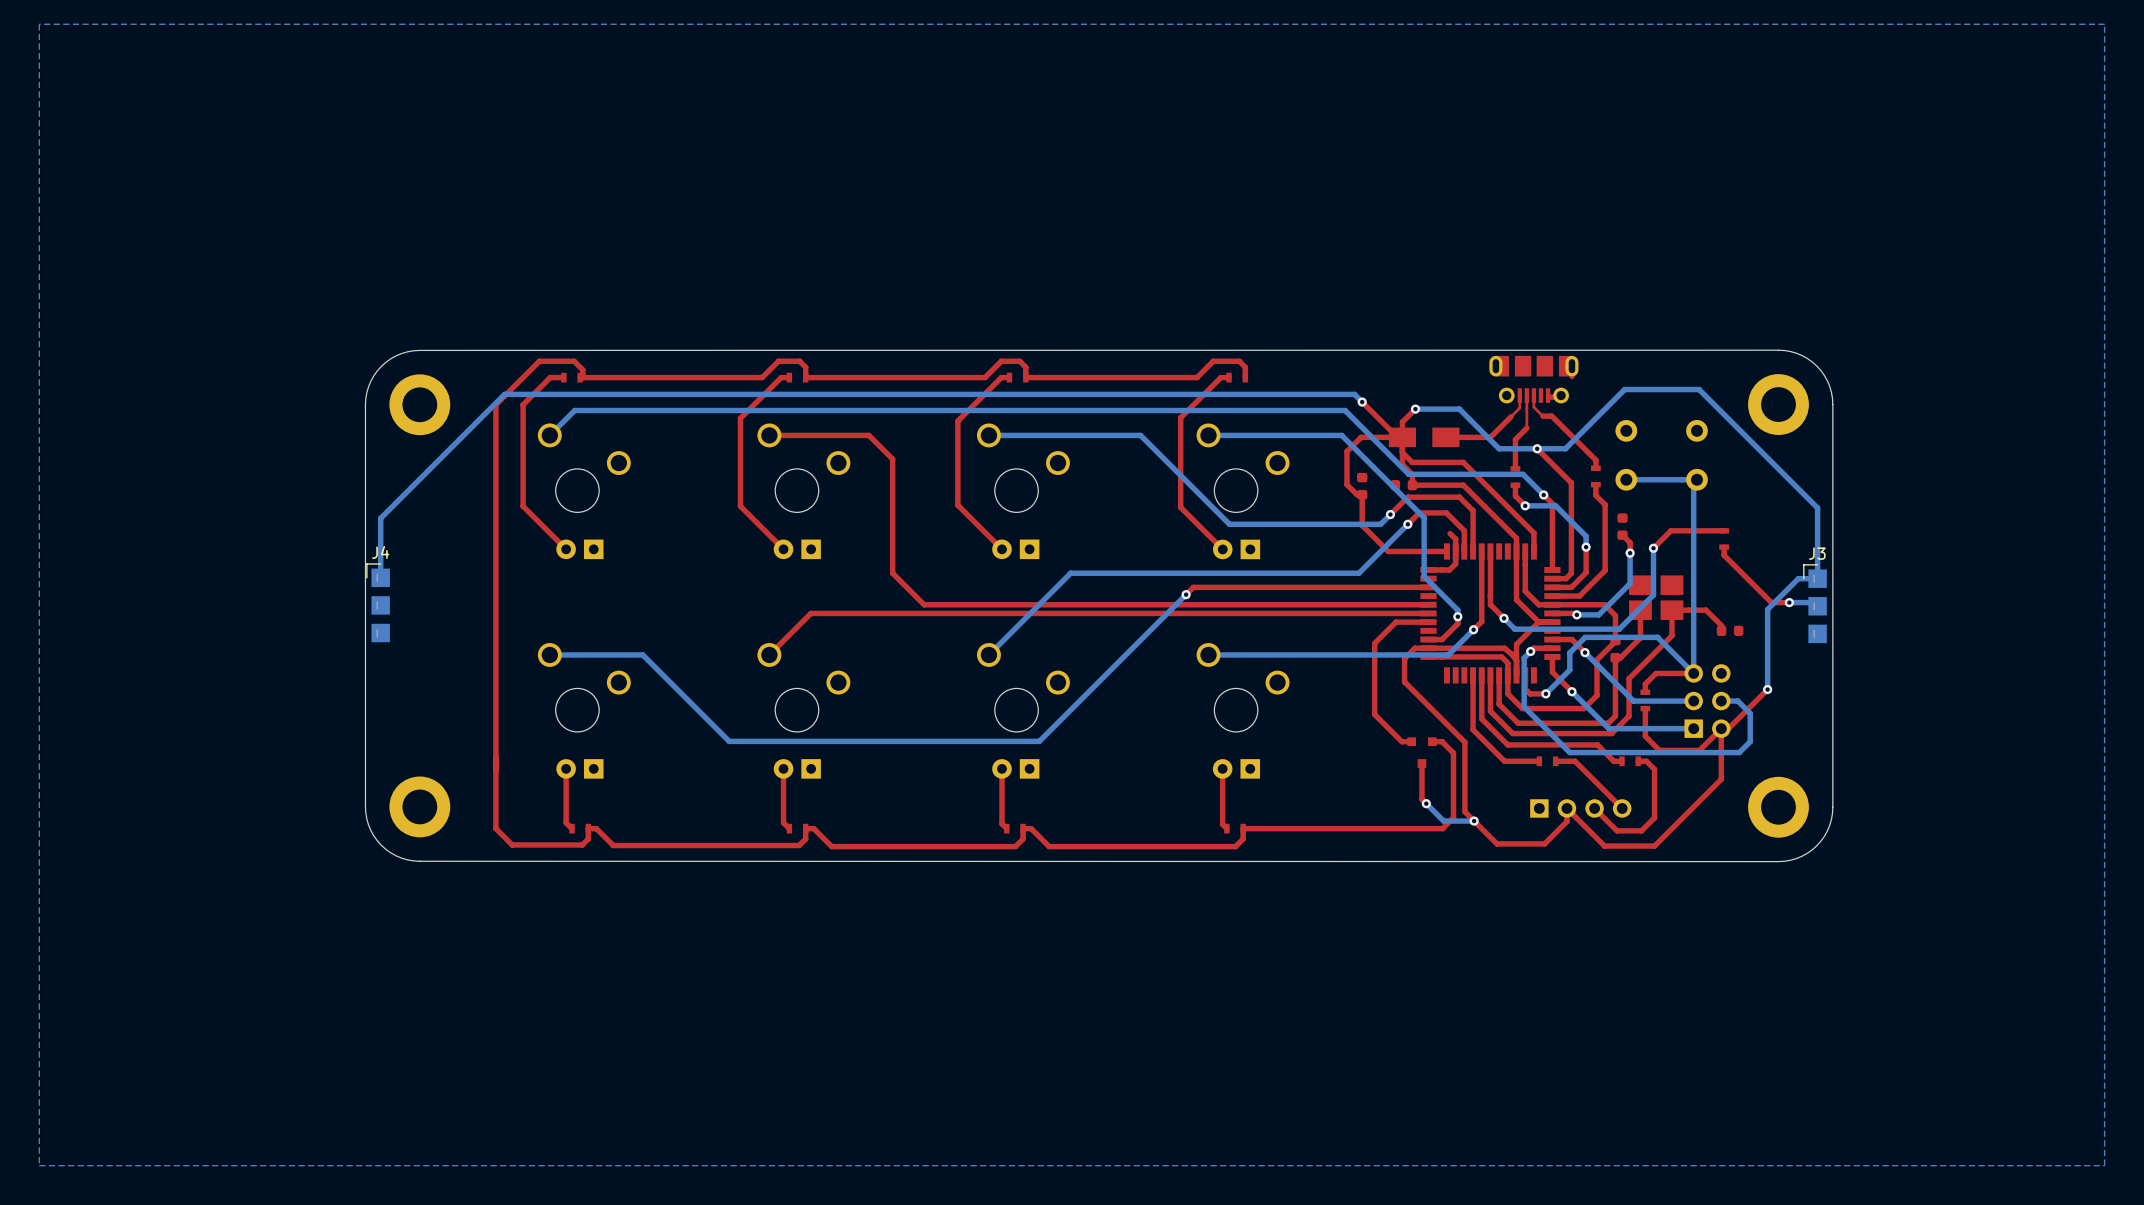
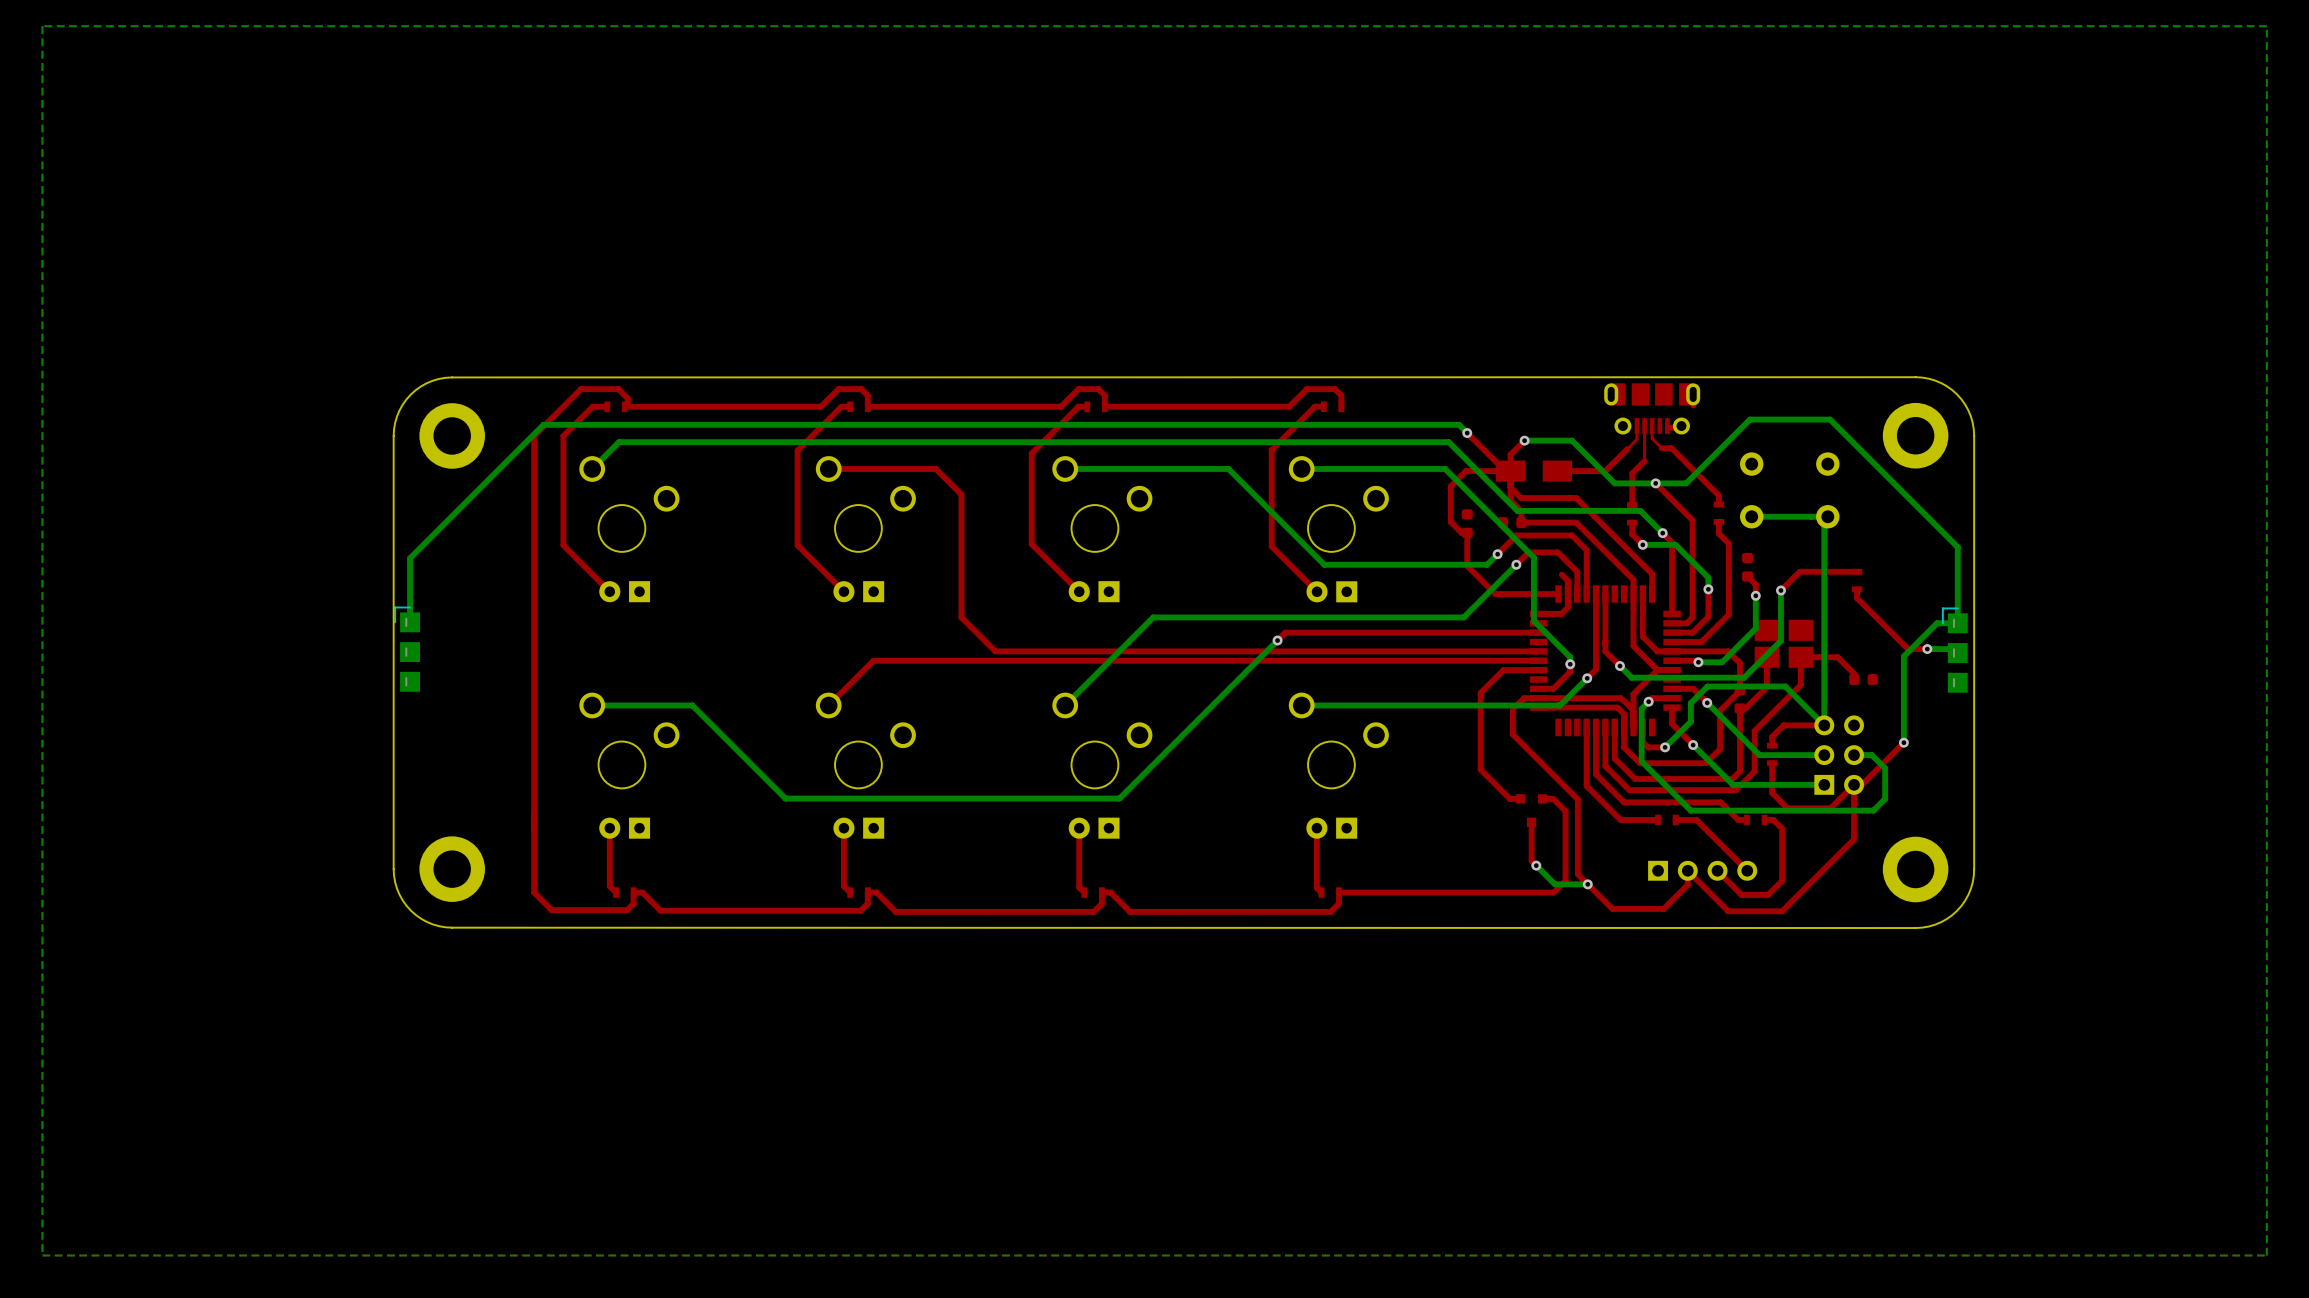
J4 name: J4 (380, 552) -> none
J3 name: J3 (1817, 553) -> none

